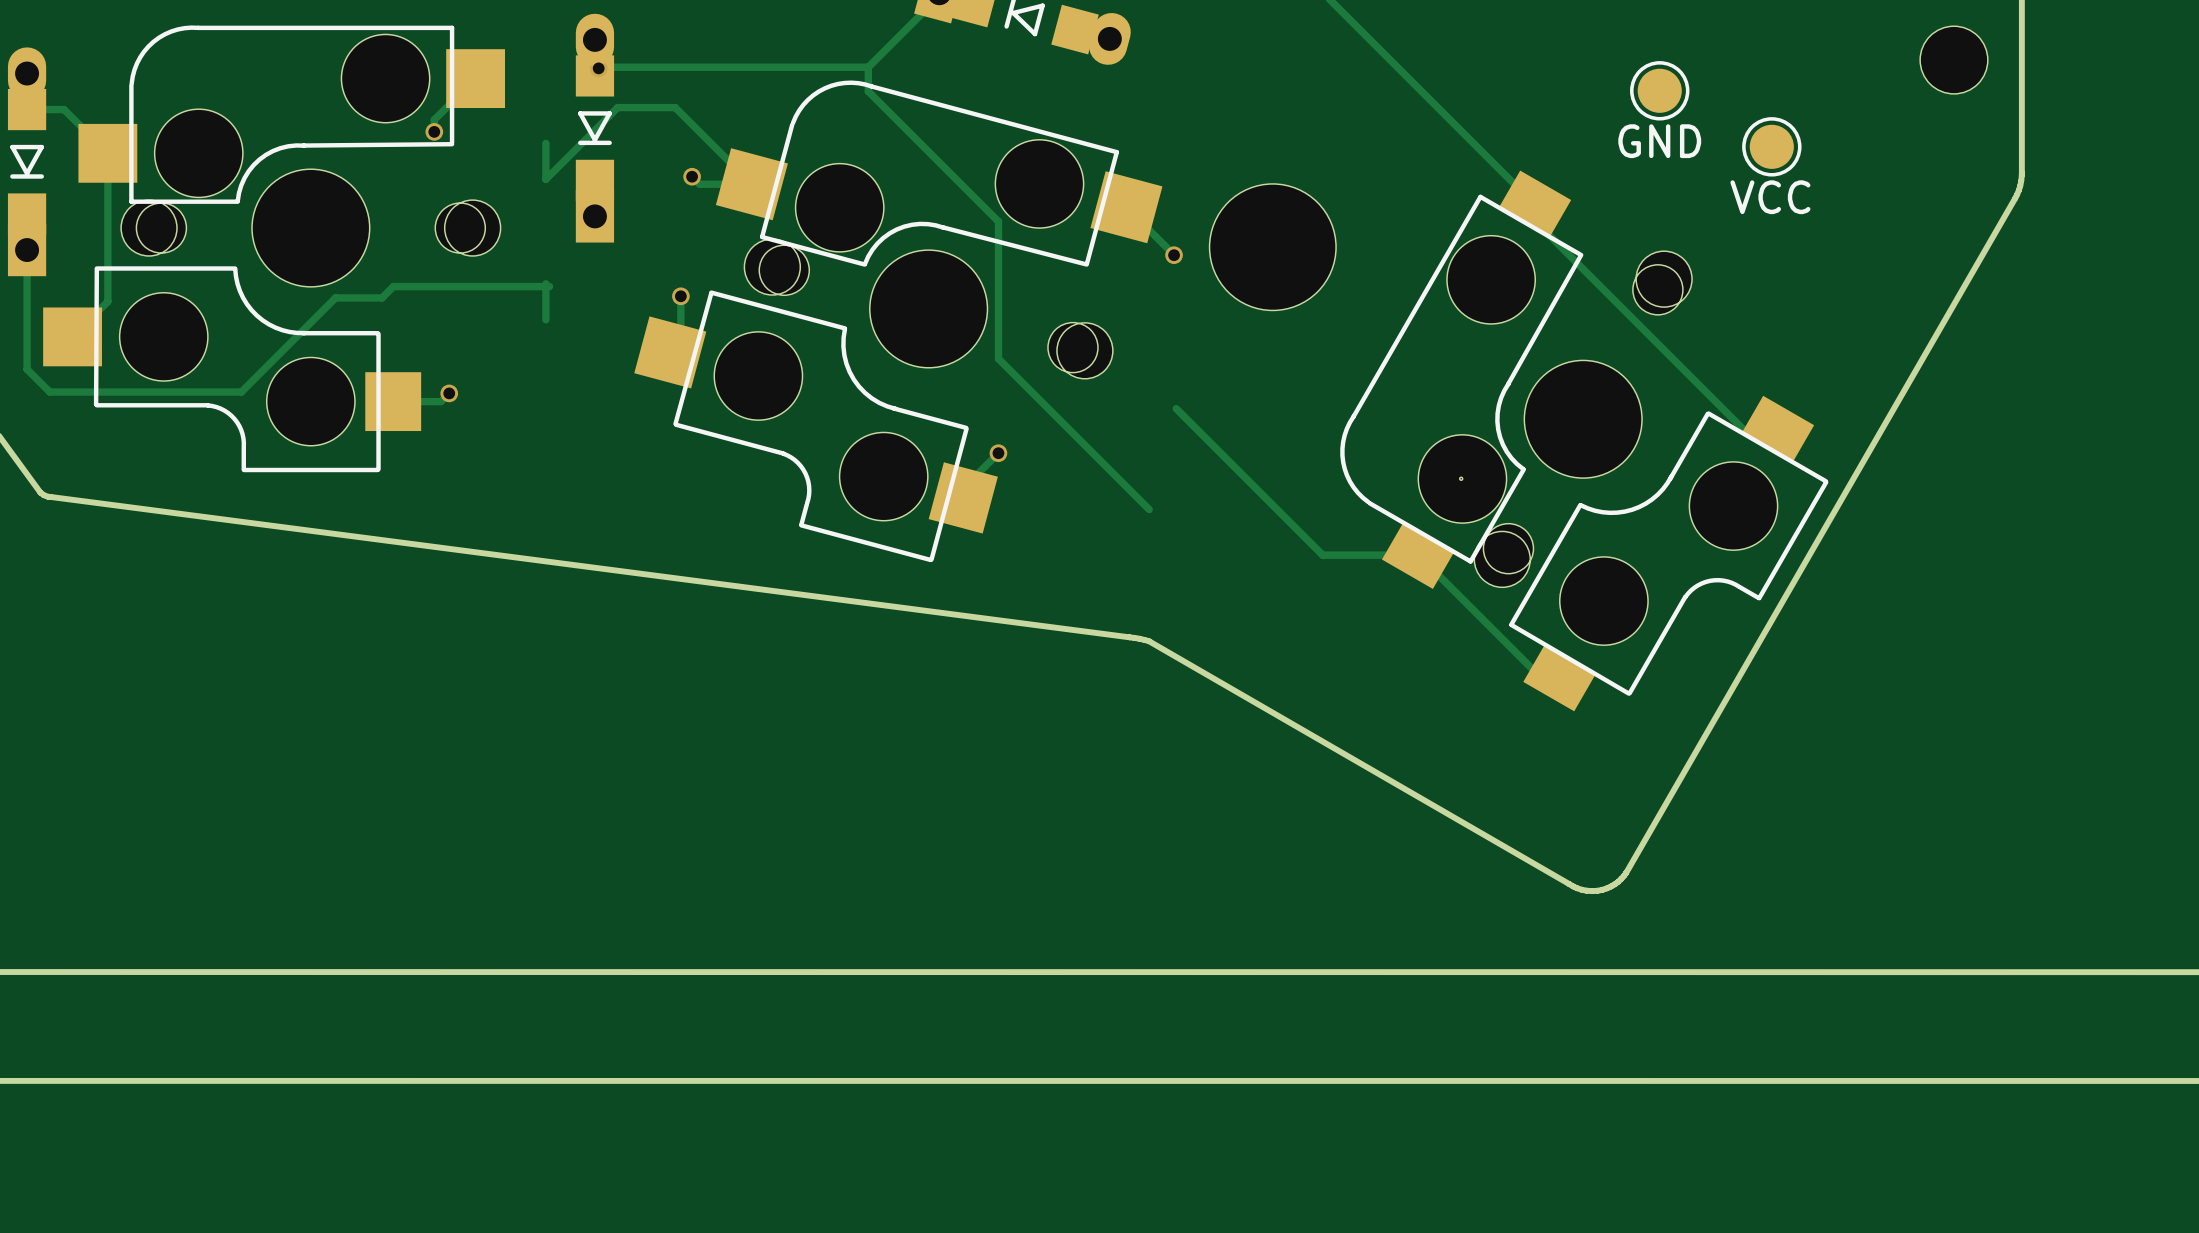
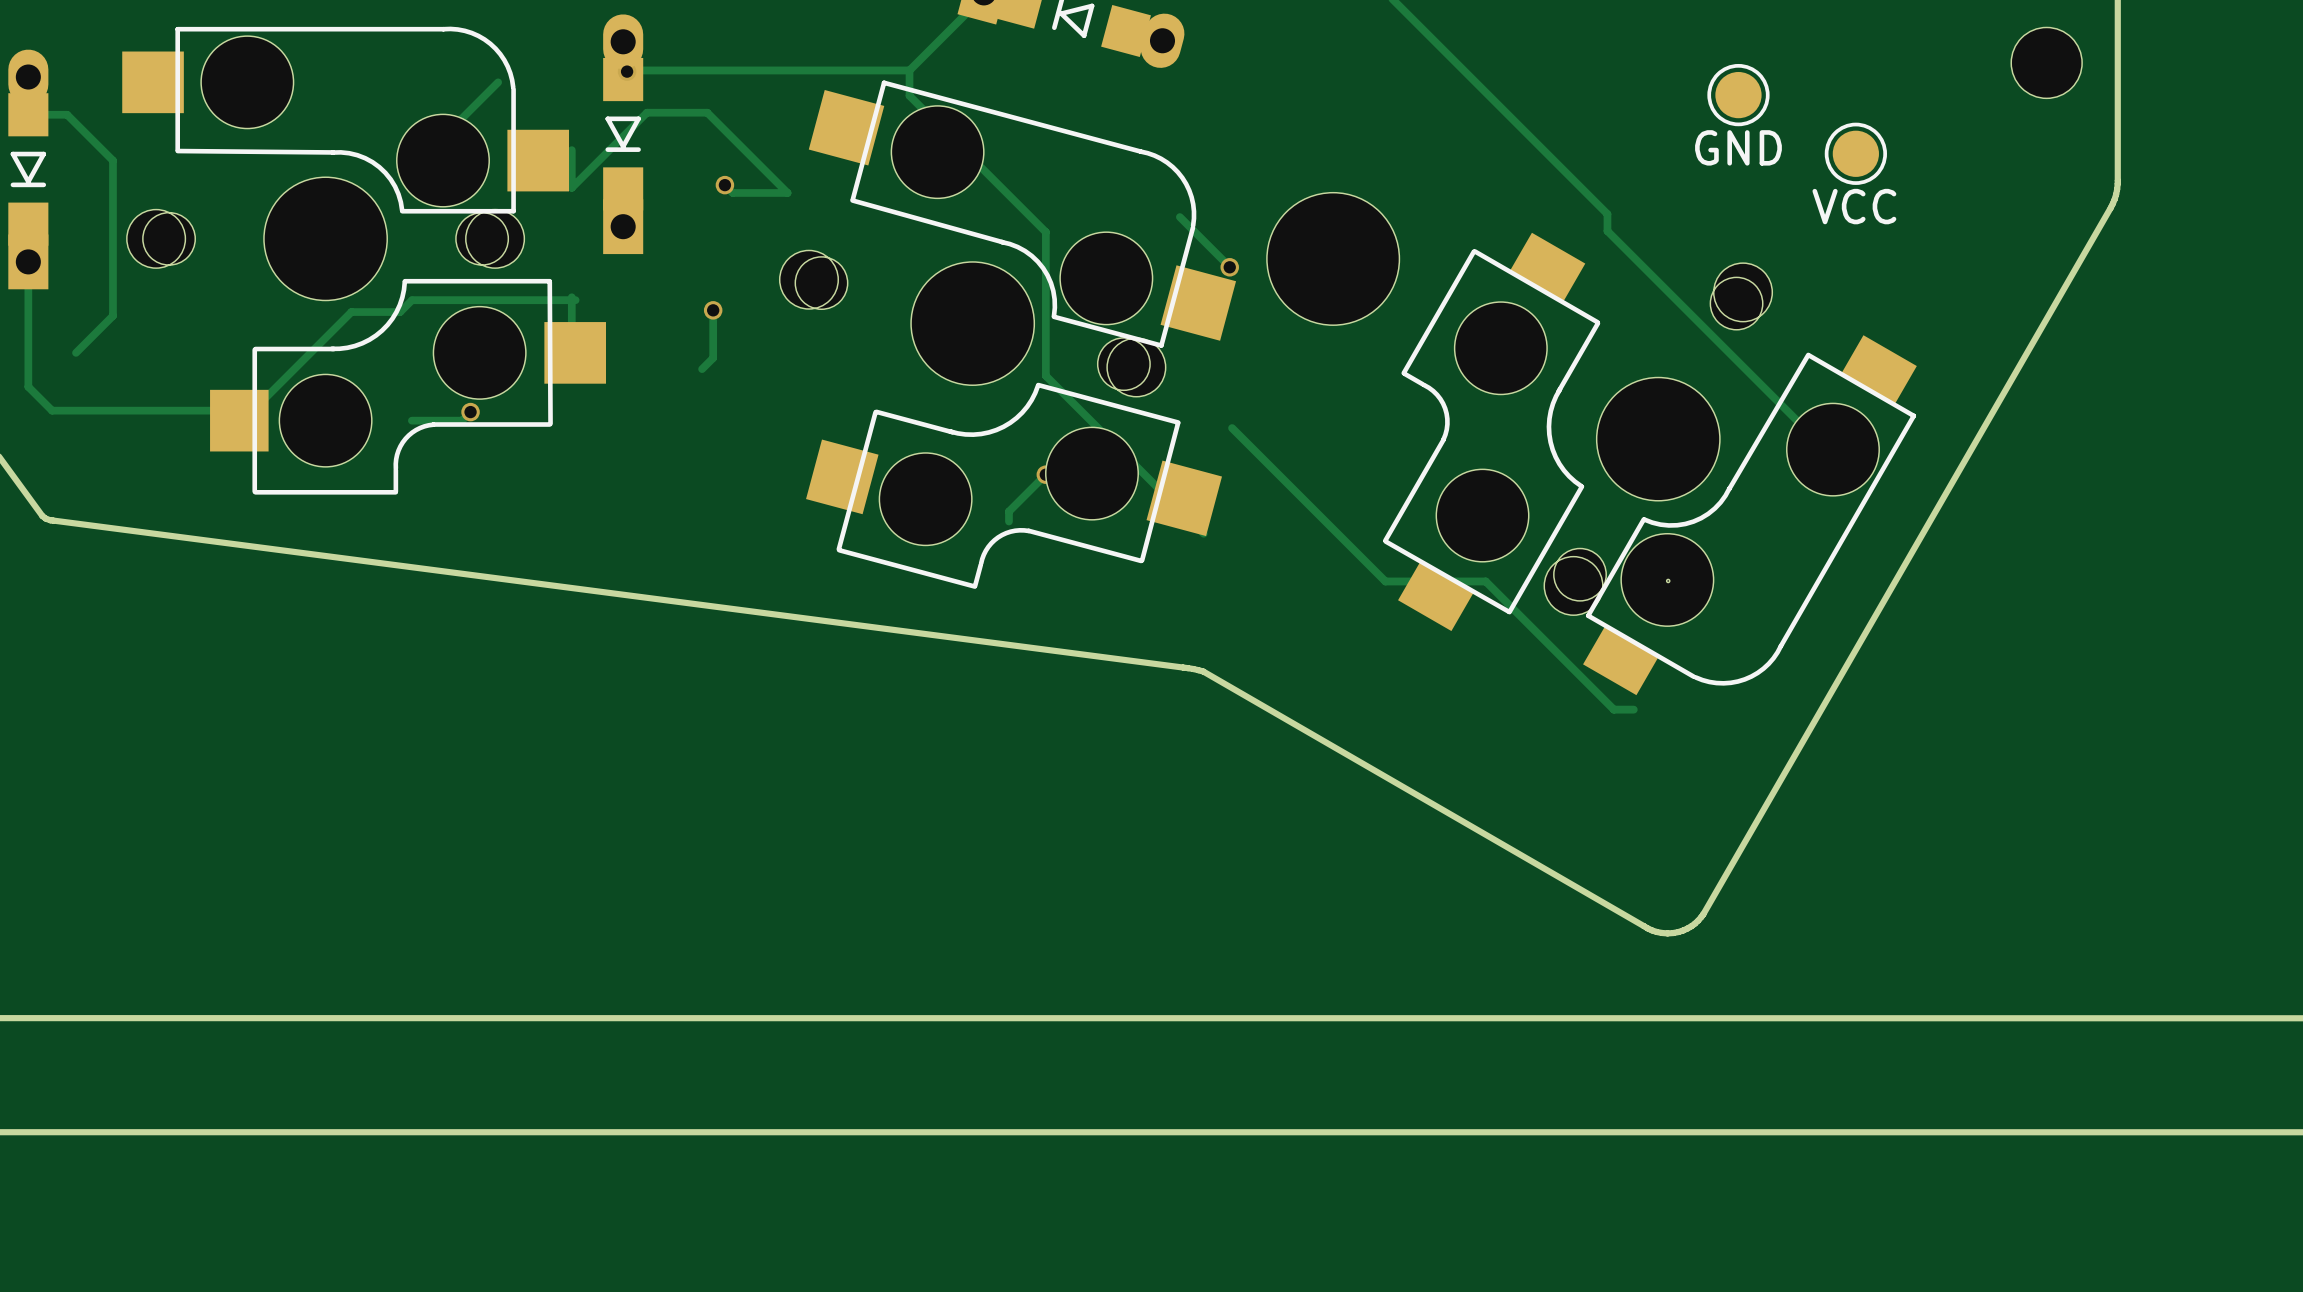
part footprint: [1340, 170, 1829, 712] -> [1383, 232, 1917, 696]
part: (274, 248) -> none
part: none -> (364, 260)
part: none -> (1007, 334)
part: (898, 321) -> none

